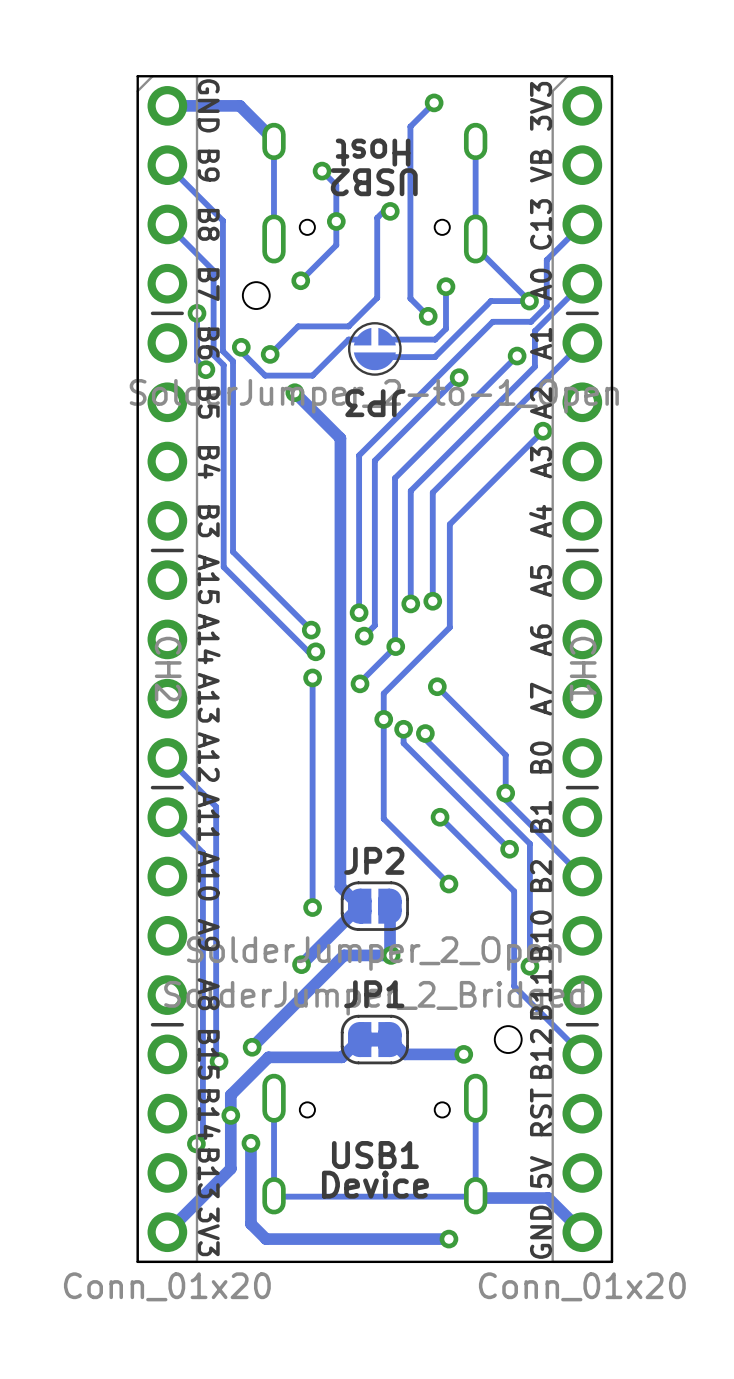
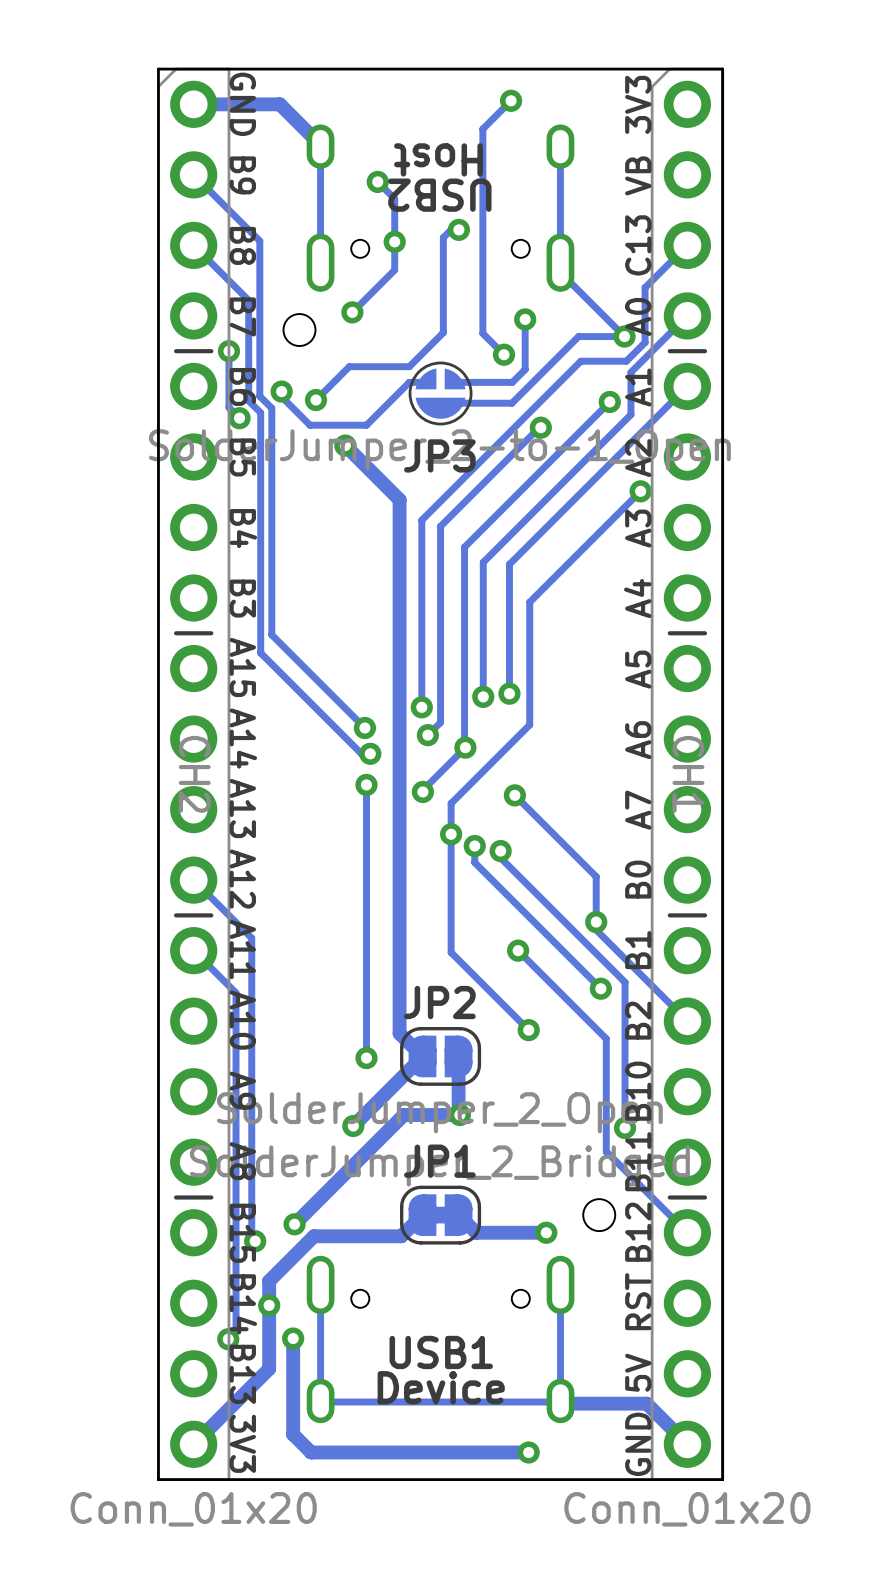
JP3 name rotation: 0° (375, 403) -> 180° (439, 455)

